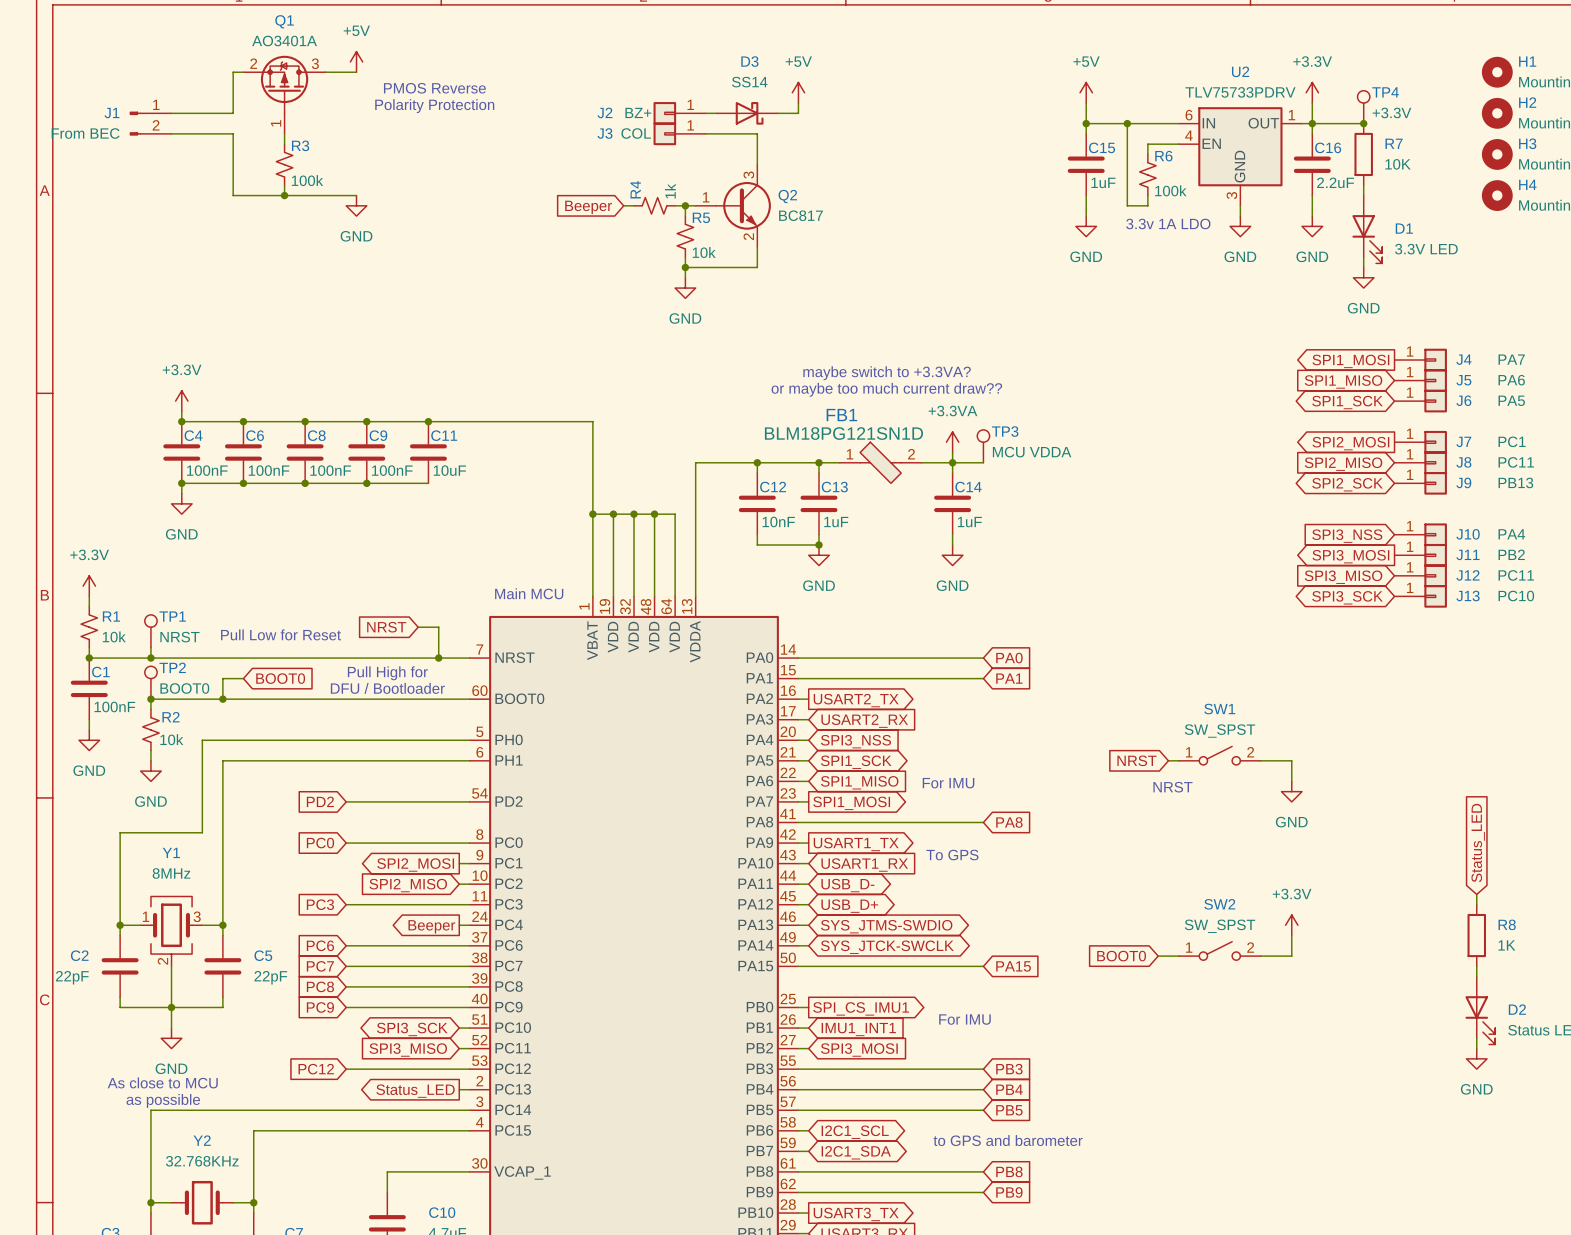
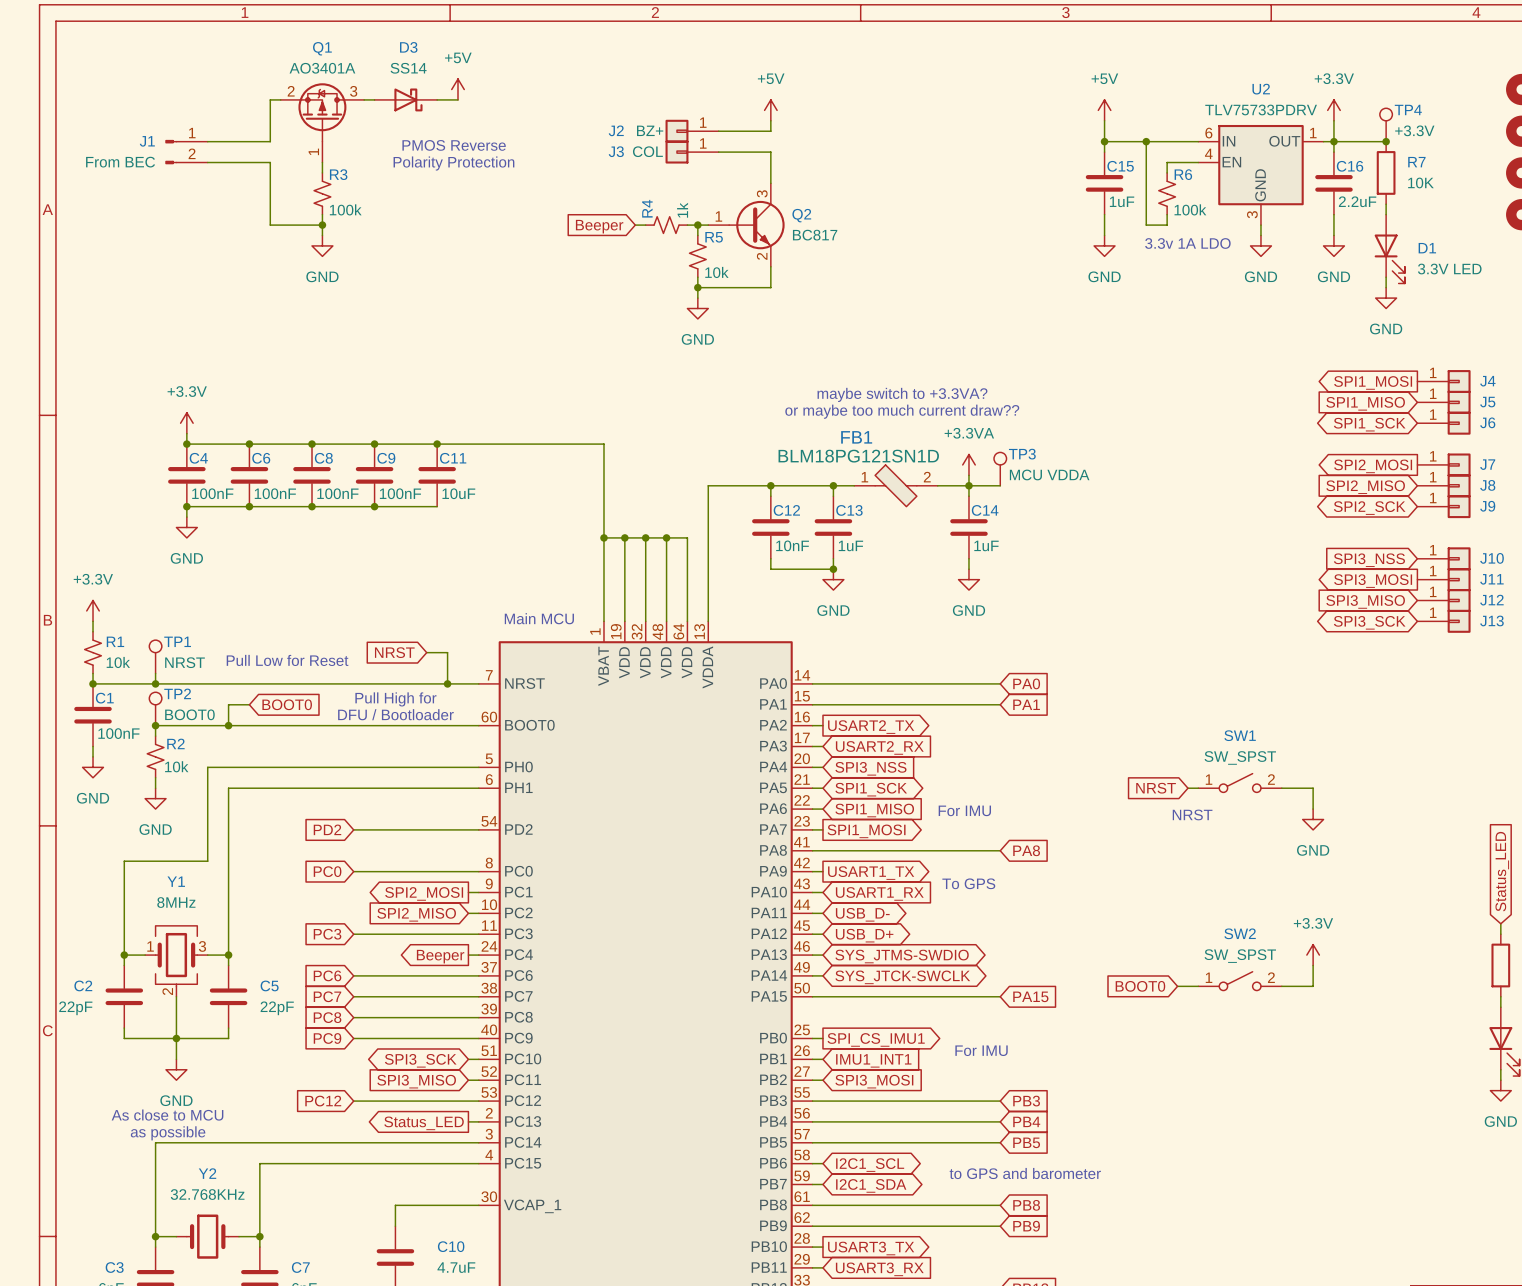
power symbol position: +5V (356, 61) -> +5V (458, 89)
wire: (243, 72) (233, 72) (233, 113) (171, 113) -> (280, 99) (270, 99) (270, 141) (207, 141)
wire: (325, 72) (356, 72) -> none
wire: none -> (364, 99) (374, 99)
wire: none -> (437, 99) (458, 99)
text position: PMOS Reverse (434, 88) -> PMOS Reverse (454, 145)
power symbol position: +5V (798, 92) -> +5V (770, 110)
Q1 position: (284, 94) -> (322, 122)
wire: (798, 103) (798, 113) (777, 113) -> none
text position: Polarity Protection (434, 106) -> Polarity Protection (453, 163)
D3 position: (747, 113) -> (405, 99)
J1 position: (150, 123) -> (186, 152)
wire: (171, 133) (233, 133) (233, 195) (356, 195) -> none
wire: (284, 133) (284, 144) -> (322, 162) (322, 172)
wire: none -> (207, 162) (270, 162) (270, 225) (322, 225)
R3 position: (284, 164) -> (322, 193)
wire: (284, 185) (284, 195) -> none
junction position: (284, 195) -> (322, 225)
wire: none -> (322, 214) (322, 235)
power symbol position: GND (356, 205) -> GND (322, 245)

